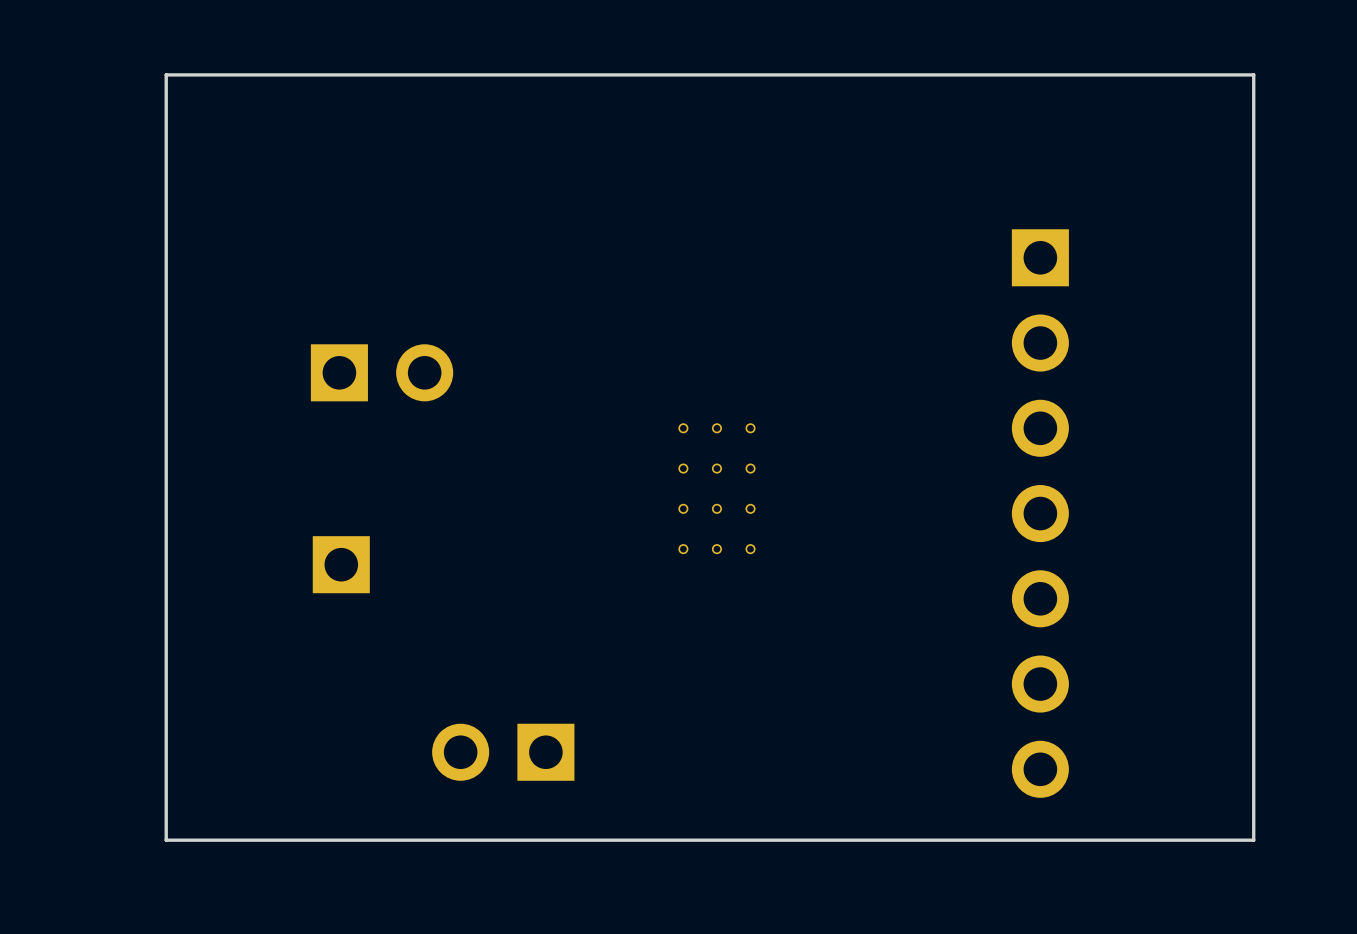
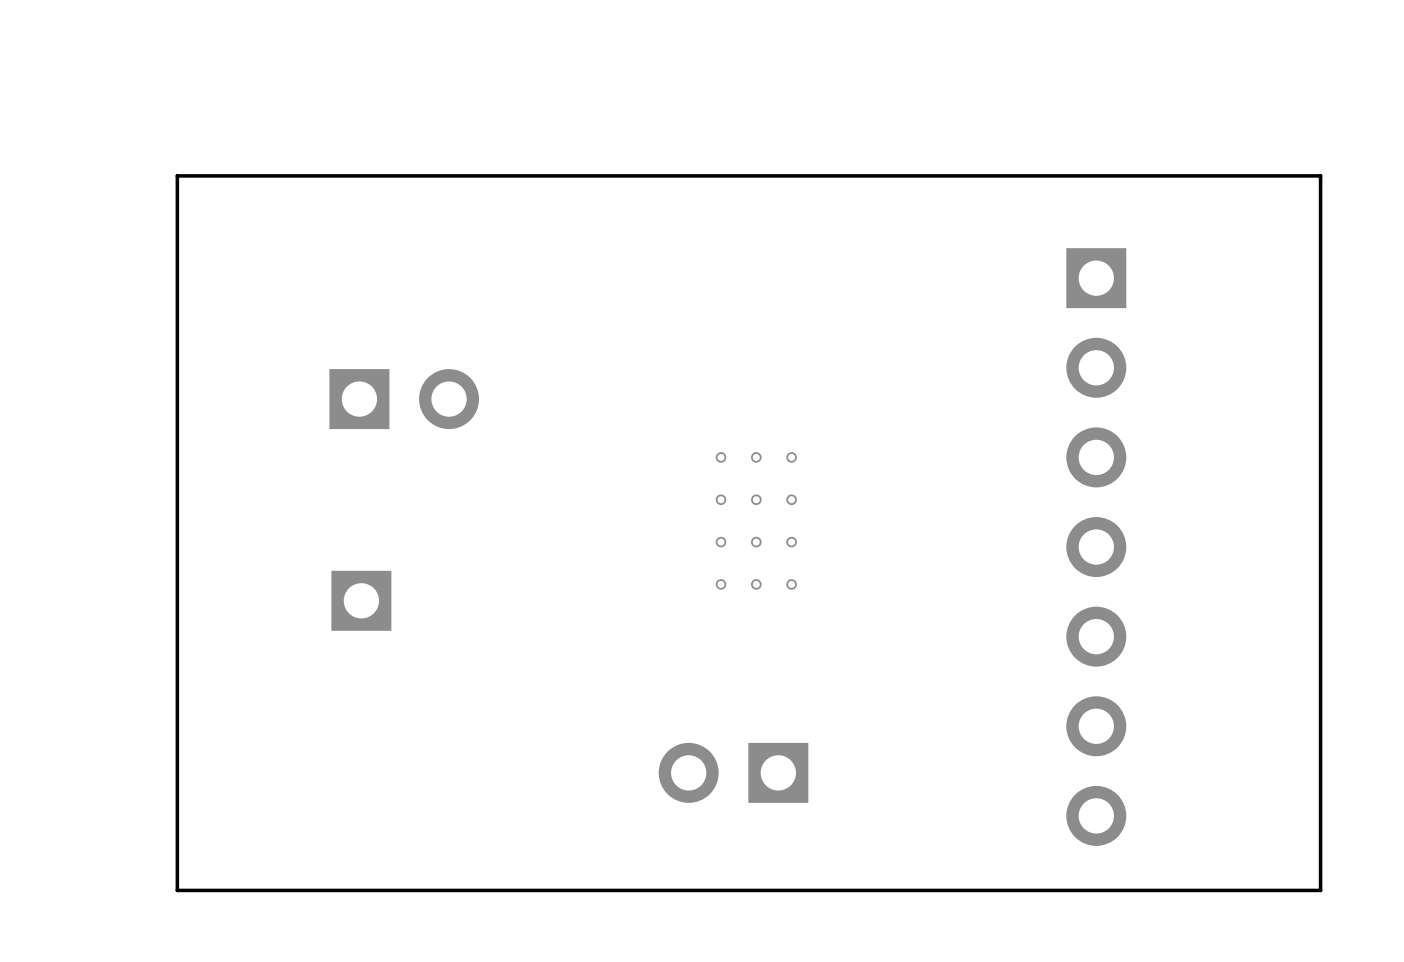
board edge: (1253, 160) (1253, 74) (166, 74) (166, 160) -> (1320, 175) (177, 175)
part position: (503, 752) -> (733, 772)

